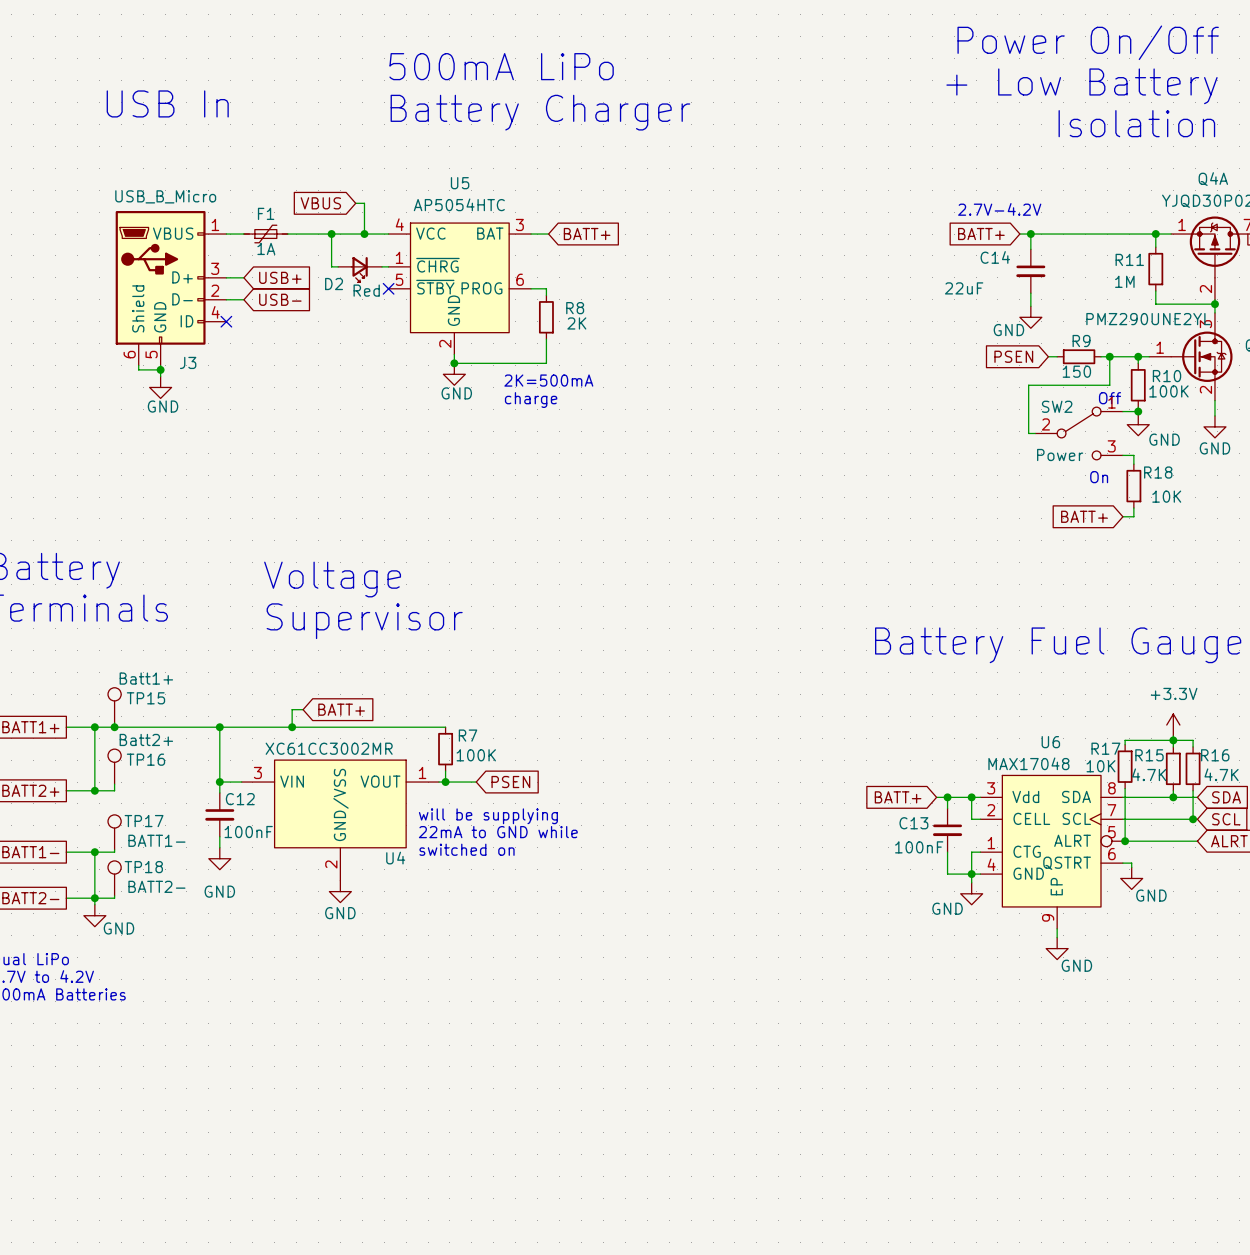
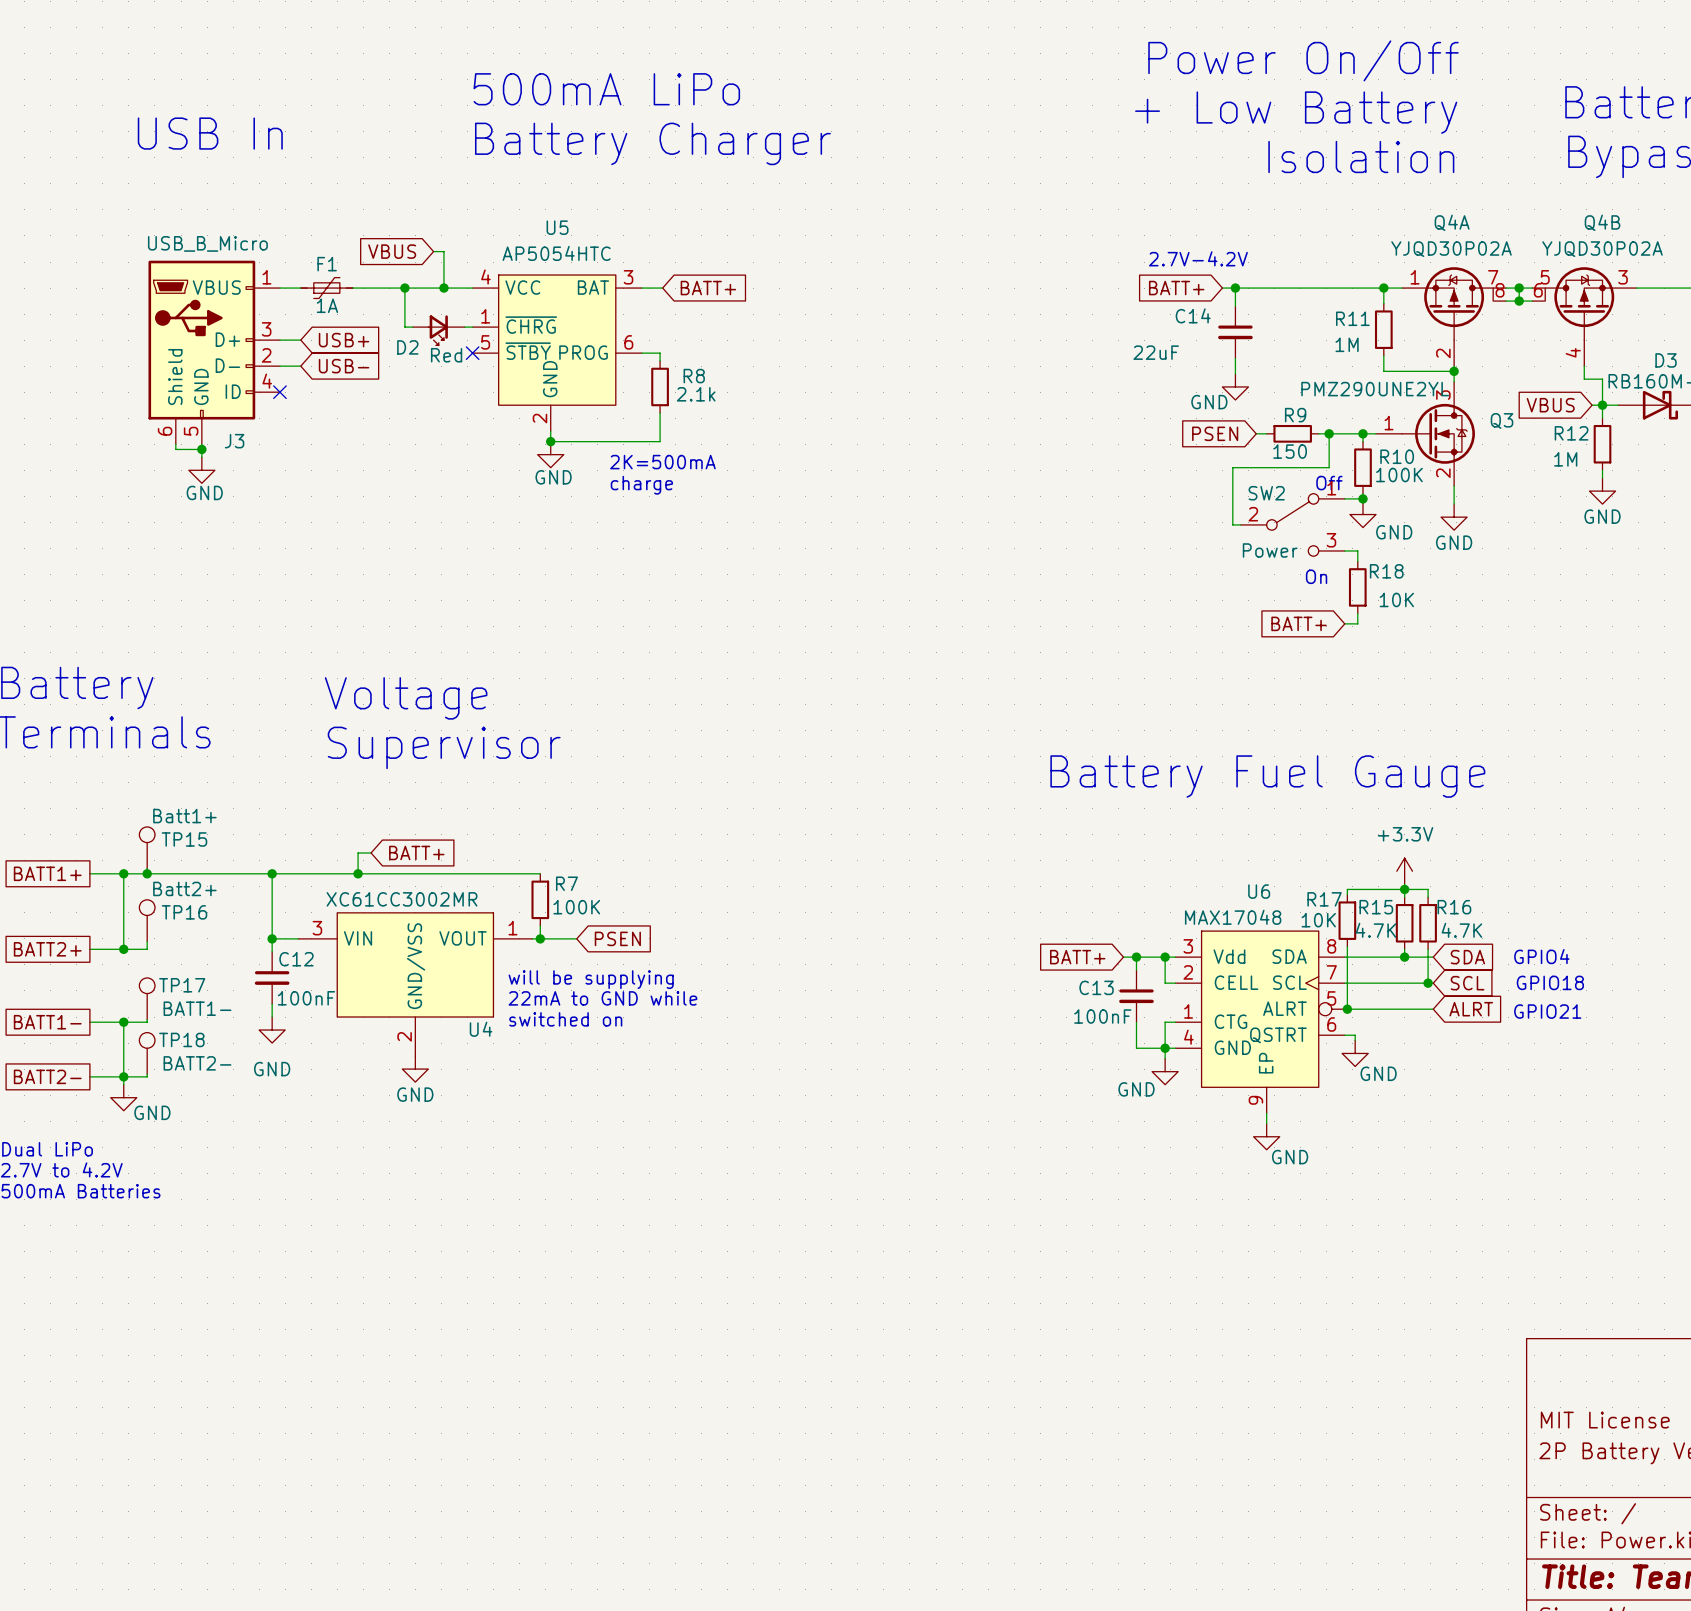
R8 value: 2K (576, 323) -> 2.1k (696, 394)

